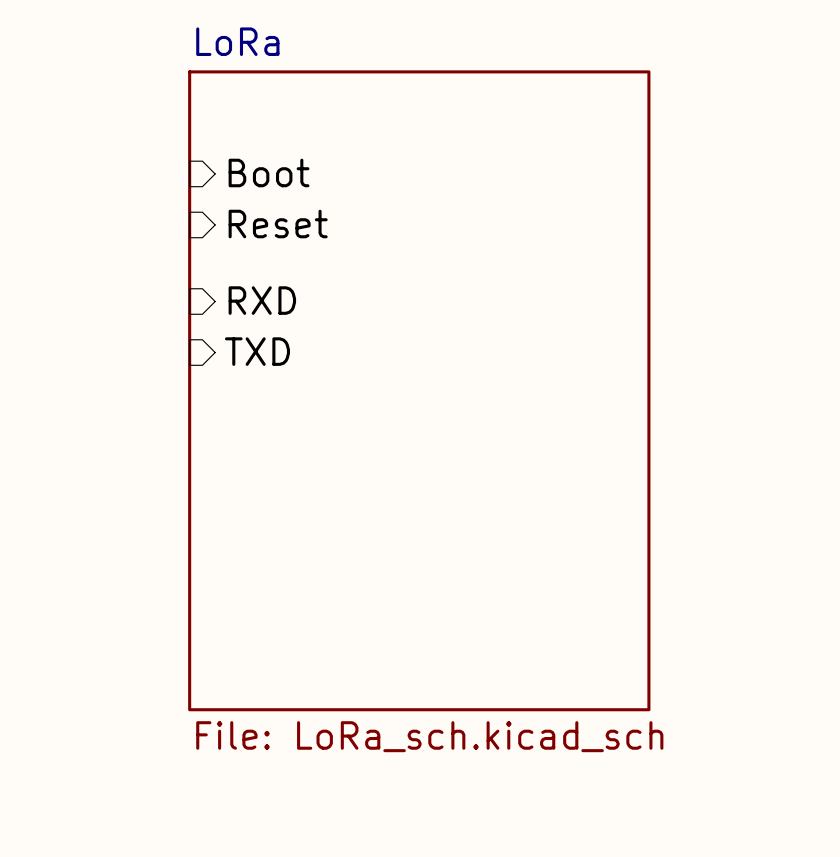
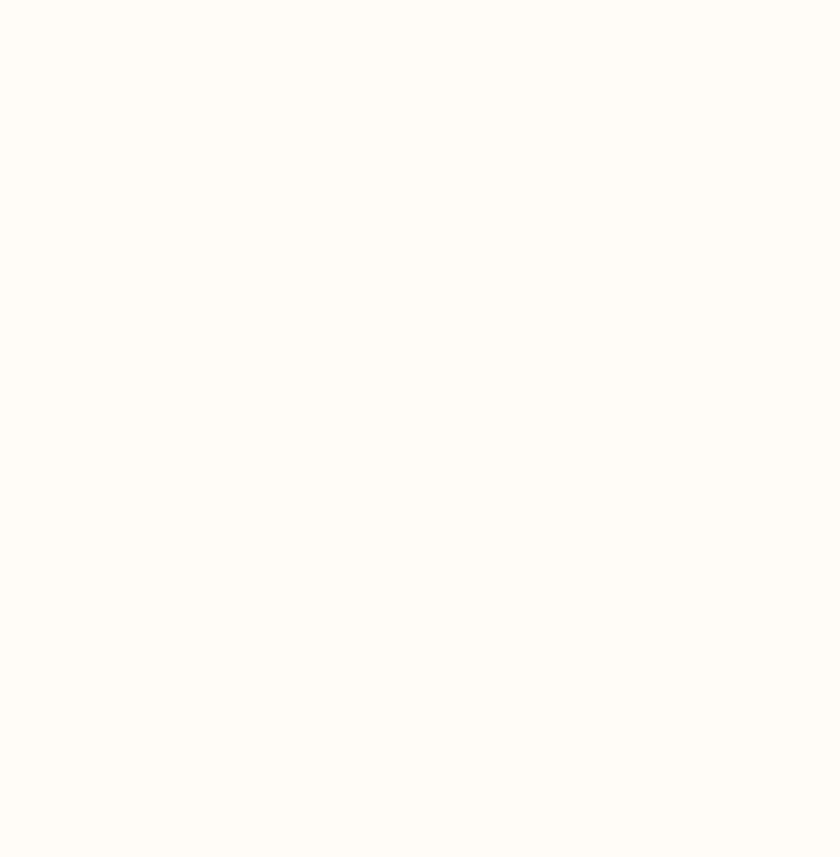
sheet pin: Boot (269, 172) -> none
sheet pin: Reset (278, 224) -> none
sheet pin: RXD (262, 300) -> none
sheet pin: TXD (257, 351) -> none
sheet LoRa: File: LoRa_sch.kicad_sch (419, 390) -> none

